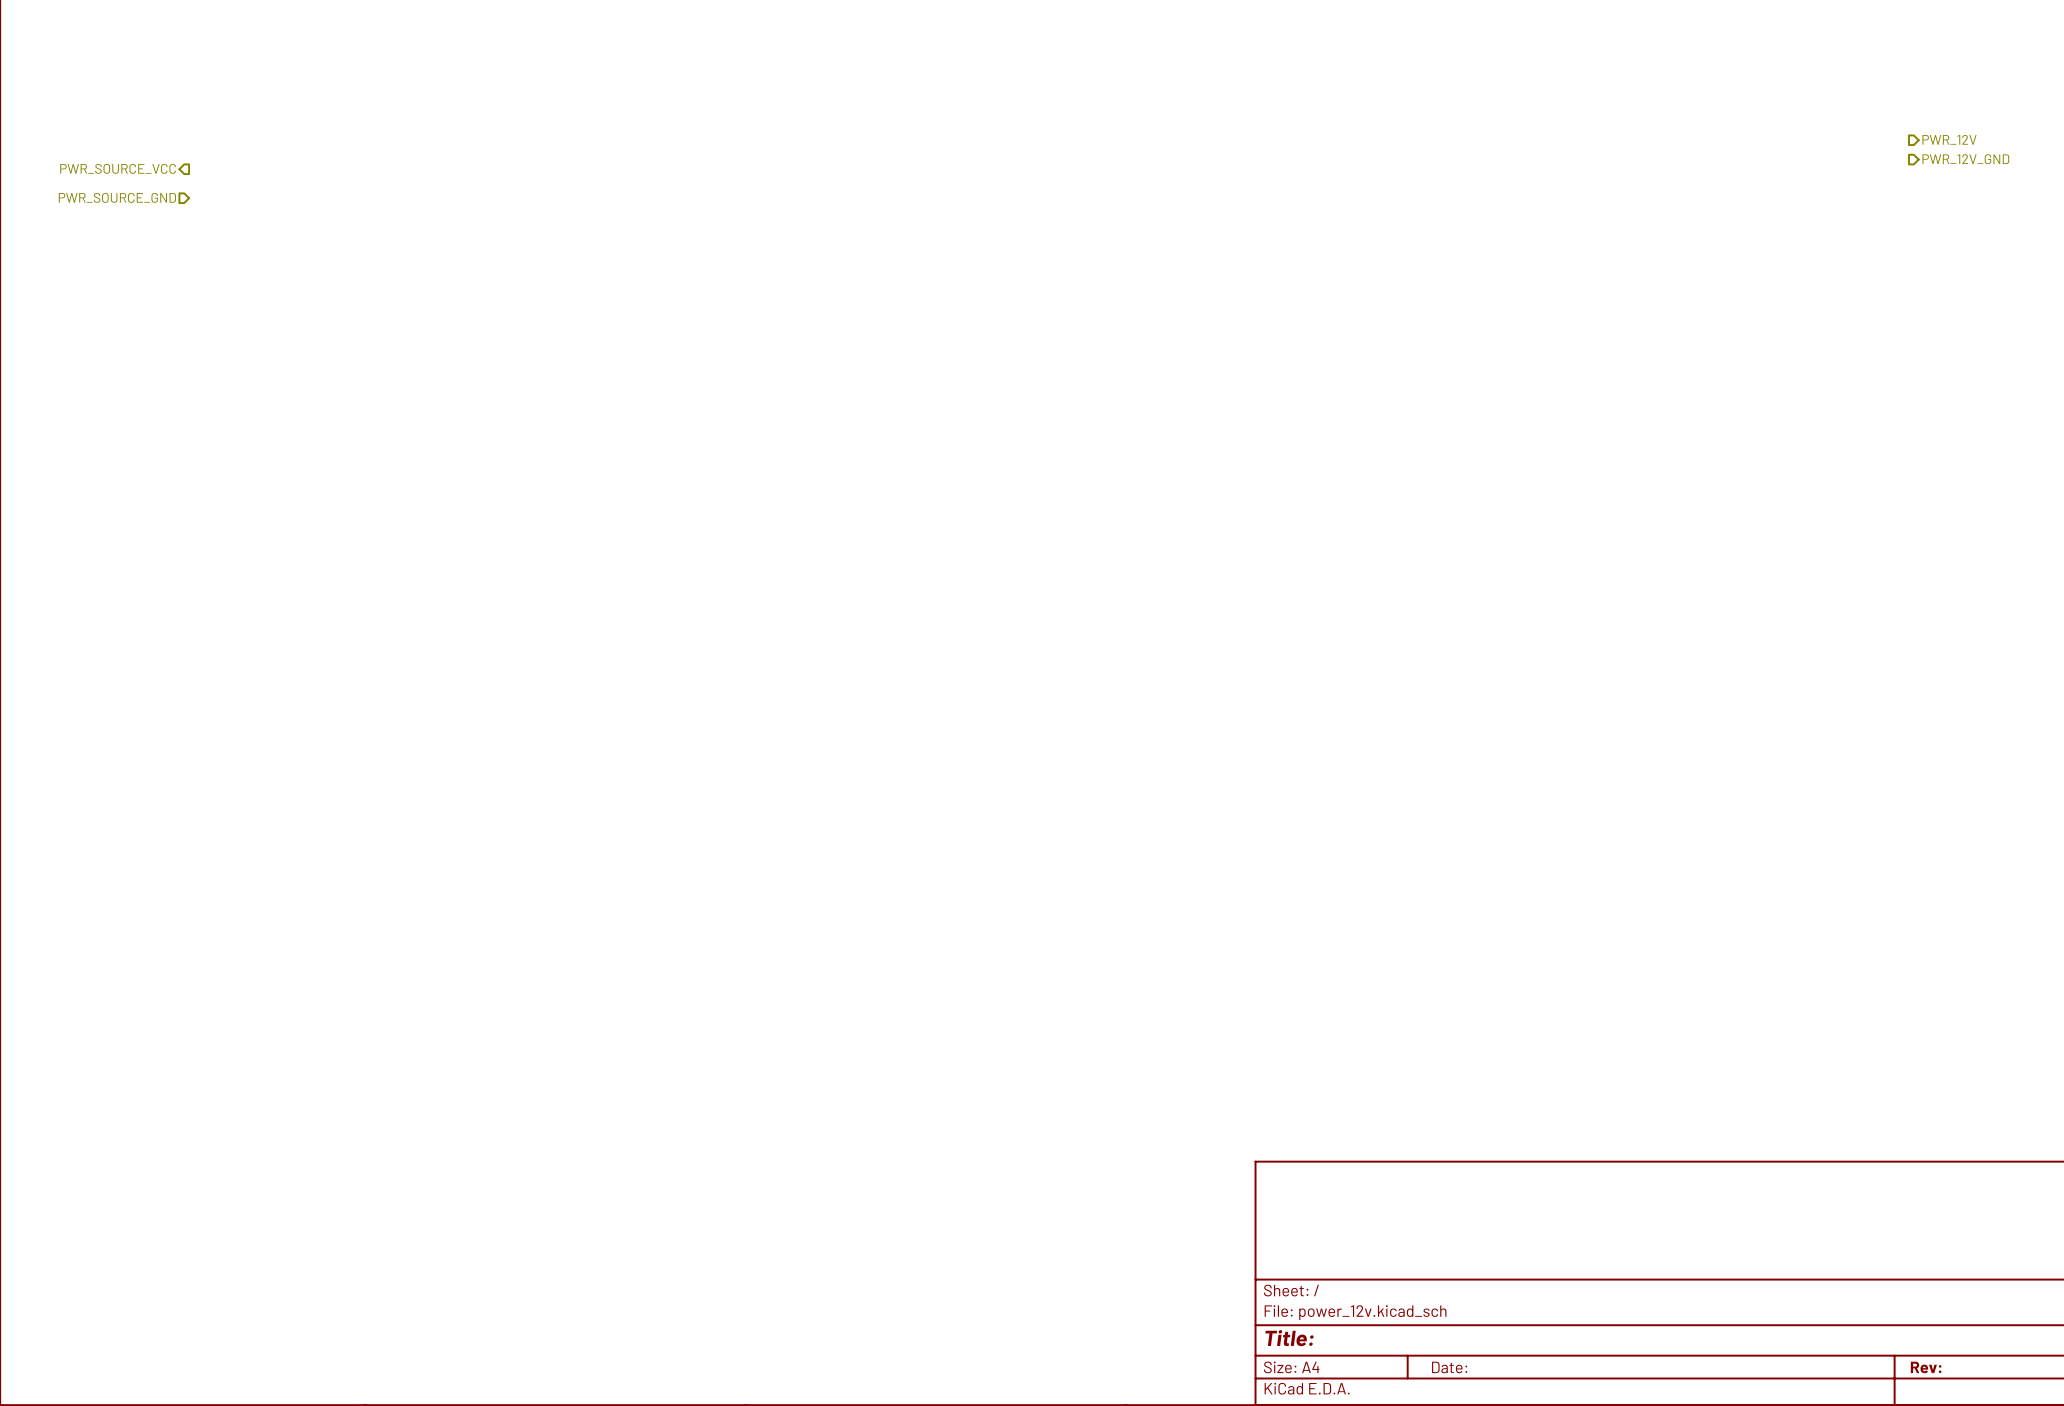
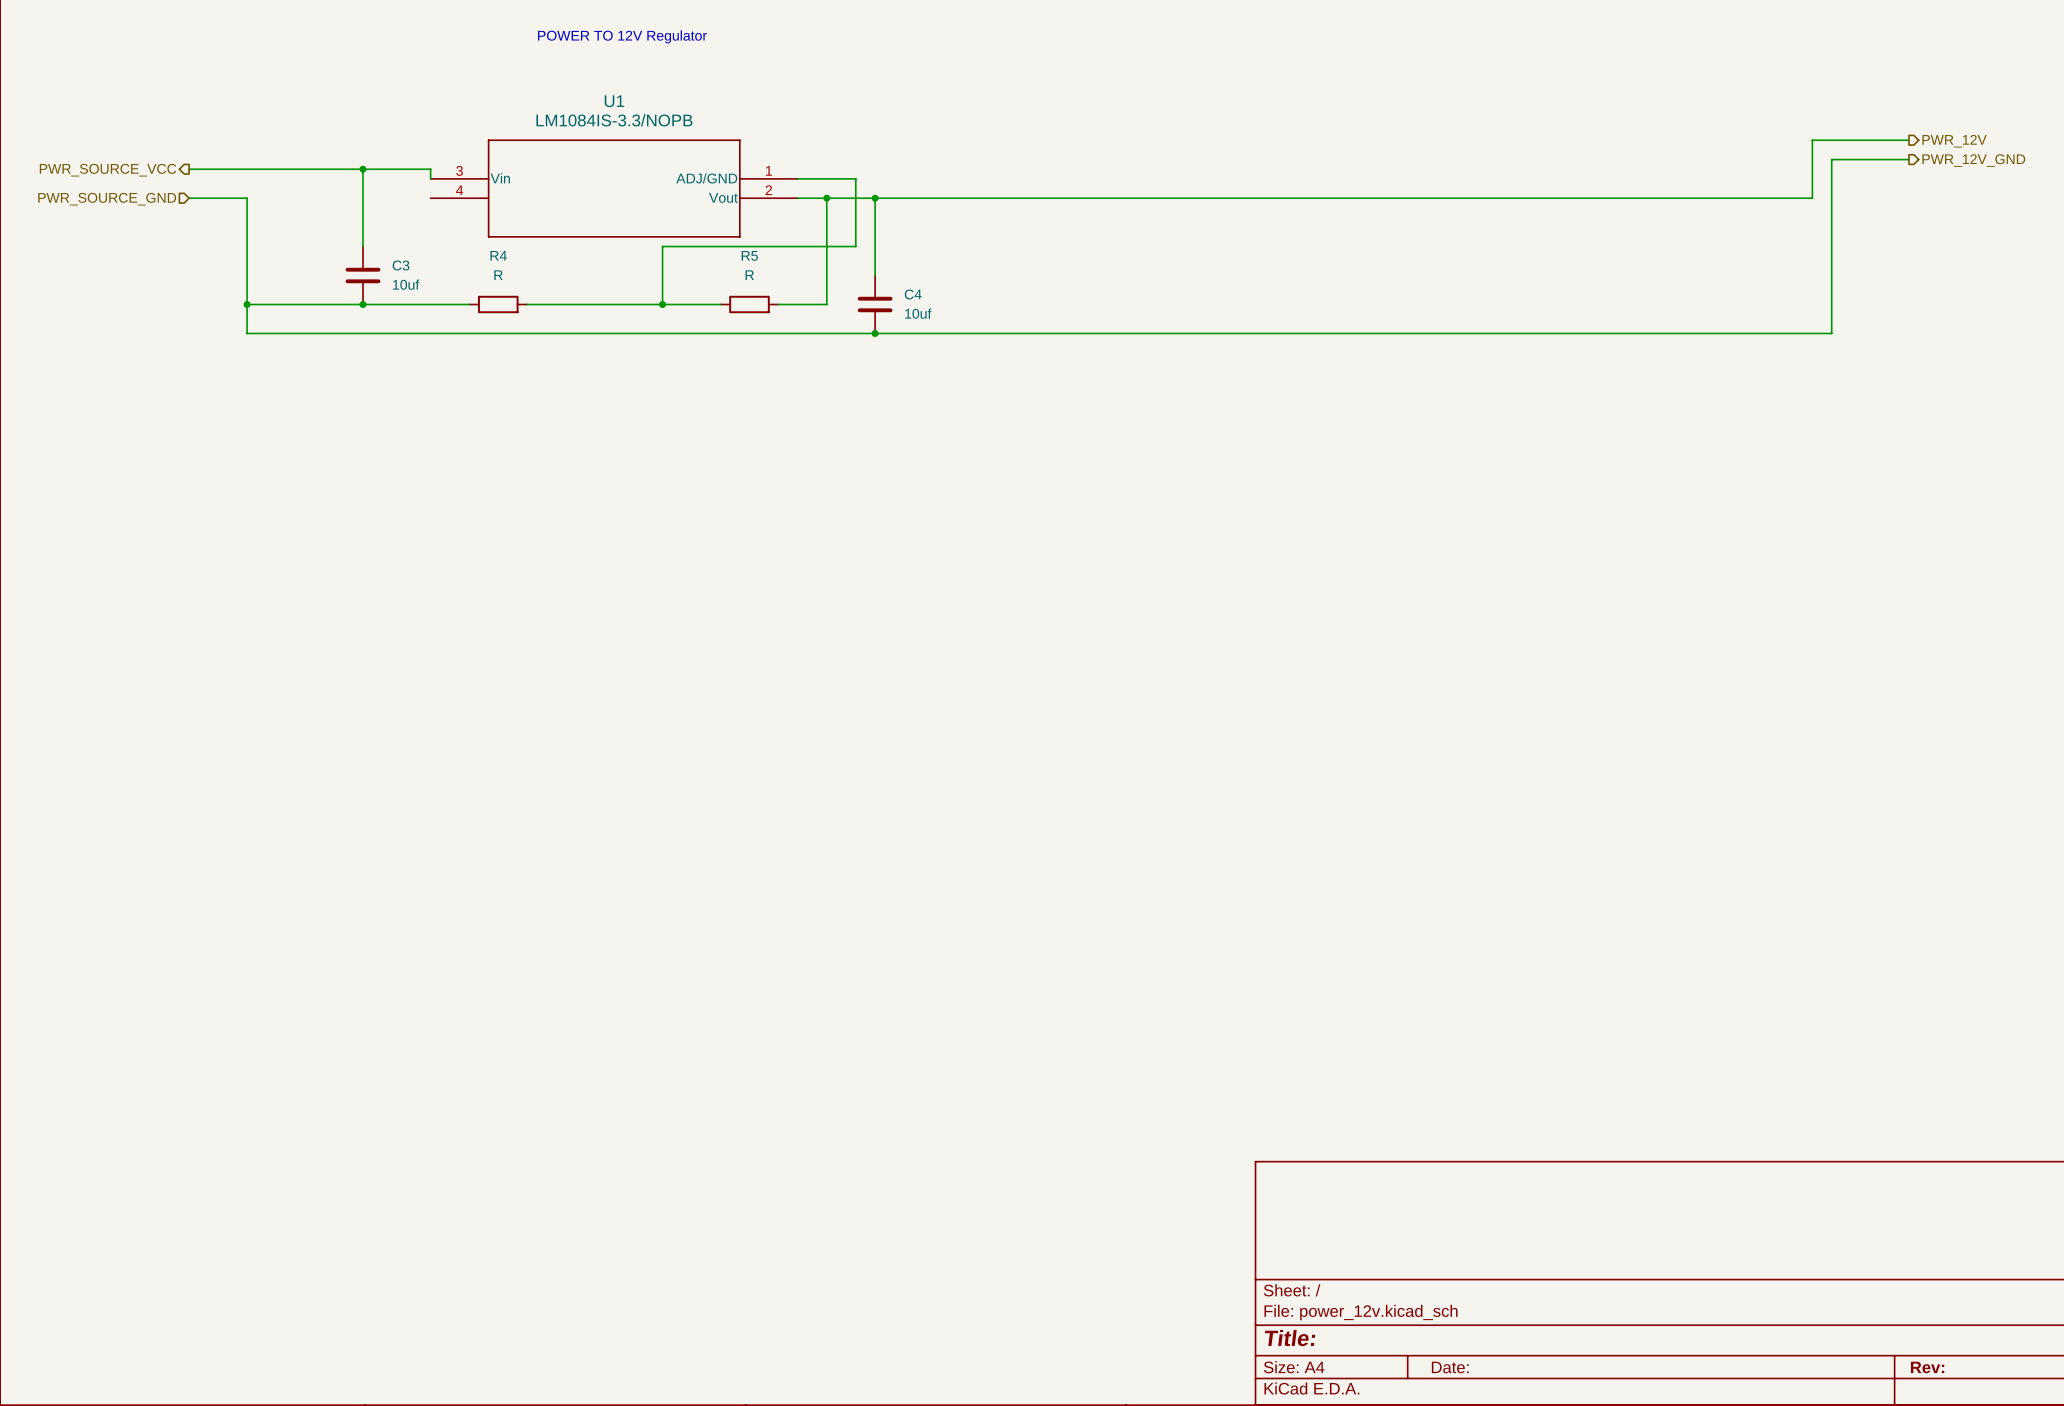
text: none -> POWER TO 12V Regulator (622, 36)
wire: none -> (1908, 140) (1812, 140) (1812, 198) (797, 198)
wire: none -> (1908, 159) (1831, 159) (1831, 333) (247, 333) (247, 198) (189, 198)
wire: none -> (189, 169) (430, 169) (430, 178)
wire: none -> (362, 169) (362, 246)
junction: none -> (362, 169)
wire: none -> (797, 178) (855, 178) (855, 246) (662, 246) (662, 304)
U1: none -> LM1084IS-3.3/NOPB (614, 188)
wire: none -> (826, 198) (826, 304) (778, 304)
junction: none -> (826, 198)
wire: none -> (875, 198) (875, 275)
junction: none -> (875, 198)
C3: none -> 10uf (362, 275)
wire: none -> (247, 304) (469, 304)
junction: none -> (247, 304)
junction: none -> (362, 304)
R4: none -> R (498, 304)
wire: none -> (527, 304) (720, 304)
junction: none -> (662, 304)
R5: none -> R (749, 304)
C4: none -> 10uf (875, 304)
junction: none -> (875, 333)

